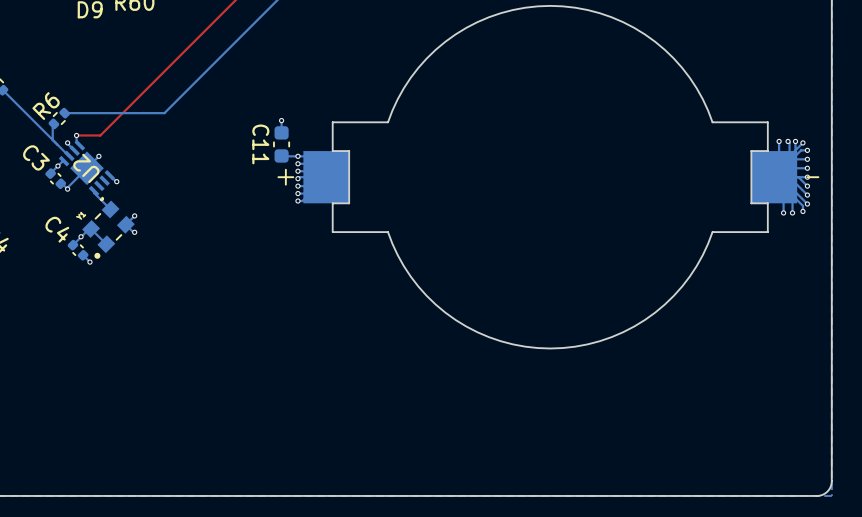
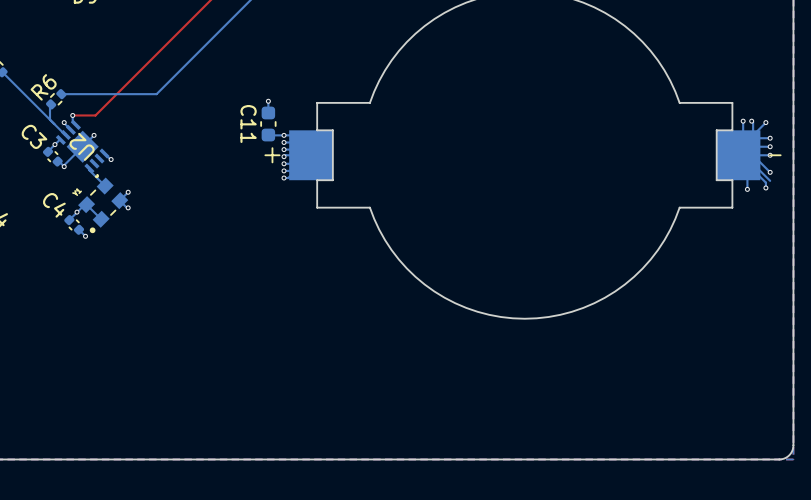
bottom track: (795, 141) (795, 155) (801, 150) (807, 150) -> none
via: (795, 141) -> none
via: (807, 150) -> none
bottom track: (798, 177) (807, 186) -> none
via: (807, 186) -> none
bottom track: (792, 195) (792, 212) -> none
via: (807, 204) -> none
via: (792, 212) -> none

